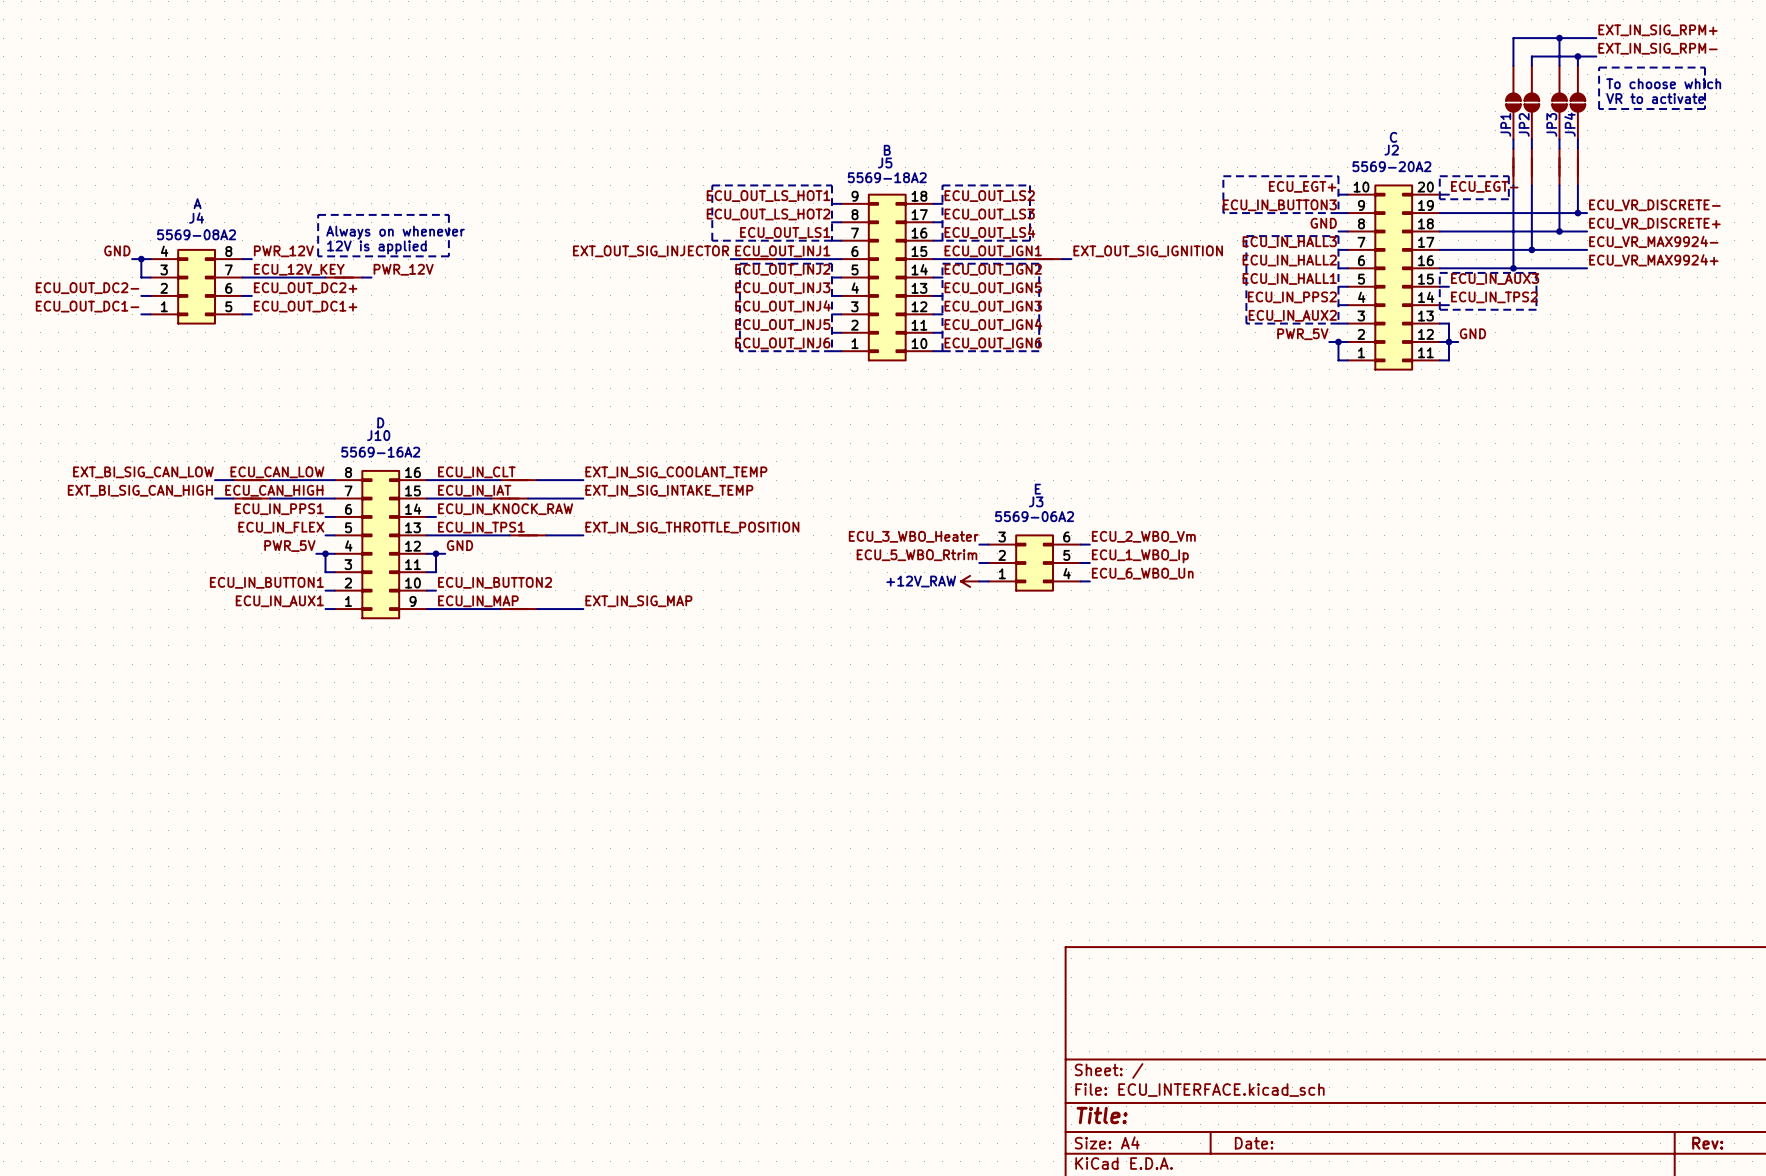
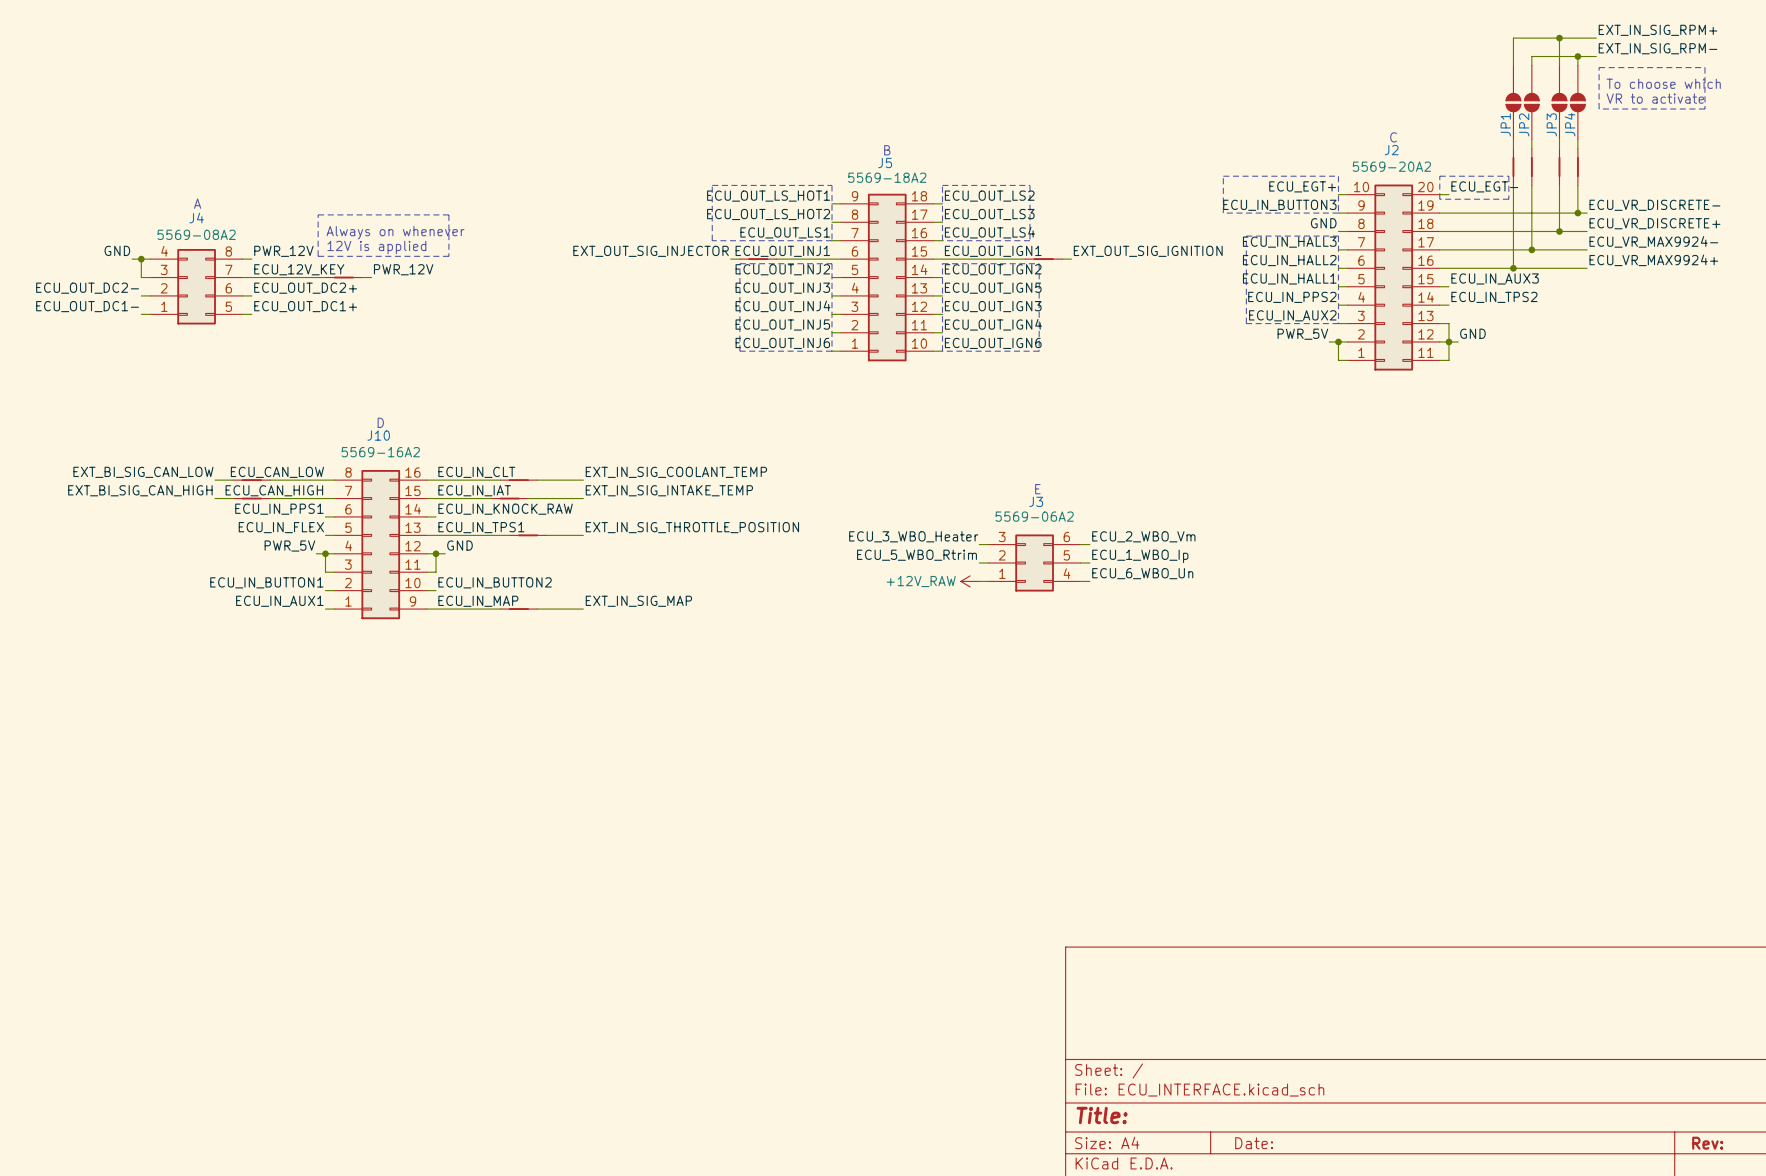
line: (1439, 272) (1536, 272) (1536, 309) (1439, 309) (1439, 272) -> none

